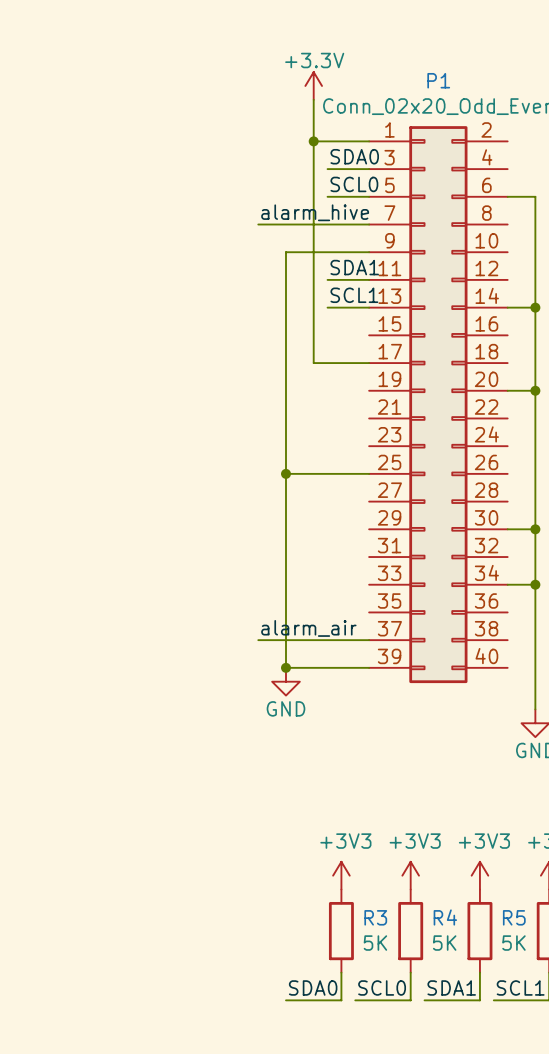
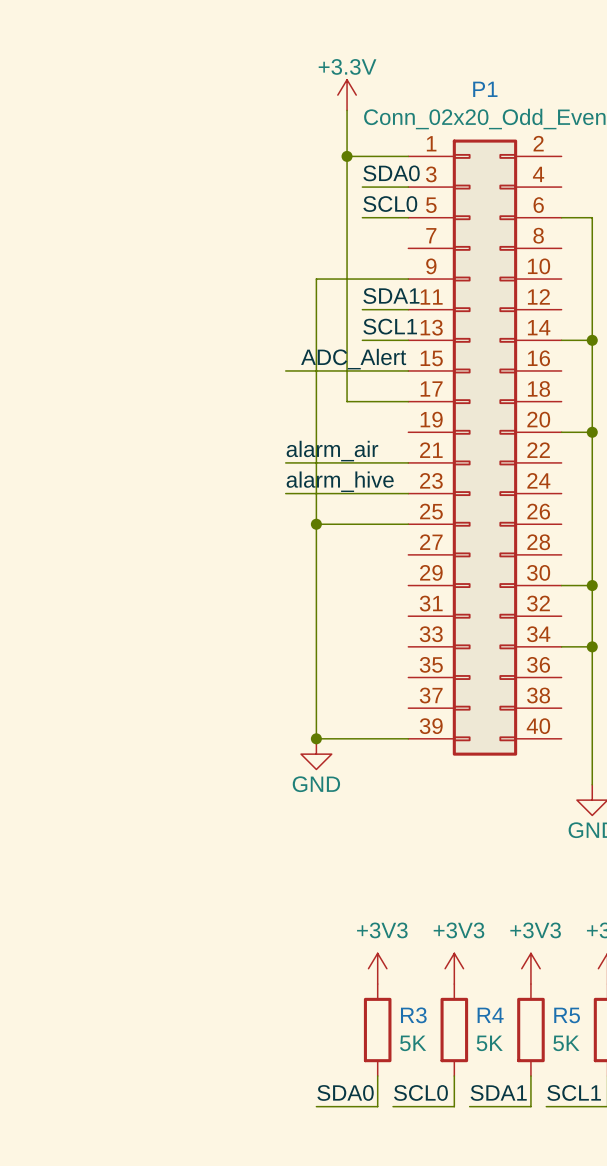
label position: alarm_hive (315, 212) -> alarm_hive (340, 481)
wire: (258, 224) (369, 224) -> (285, 370) (408, 370)
label: none -> ADC_Alert (353, 359)
wire: none -> (285, 462) (408, 462)
label position: alarm_air (308, 628) -> alarm_air (332, 451)
wire: (258, 640) (369, 640) -> (285, 493) (408, 493)

